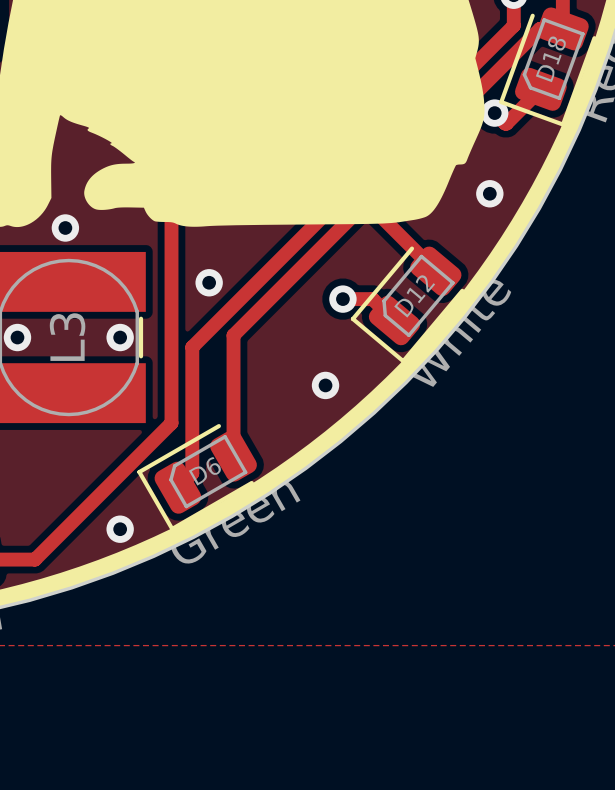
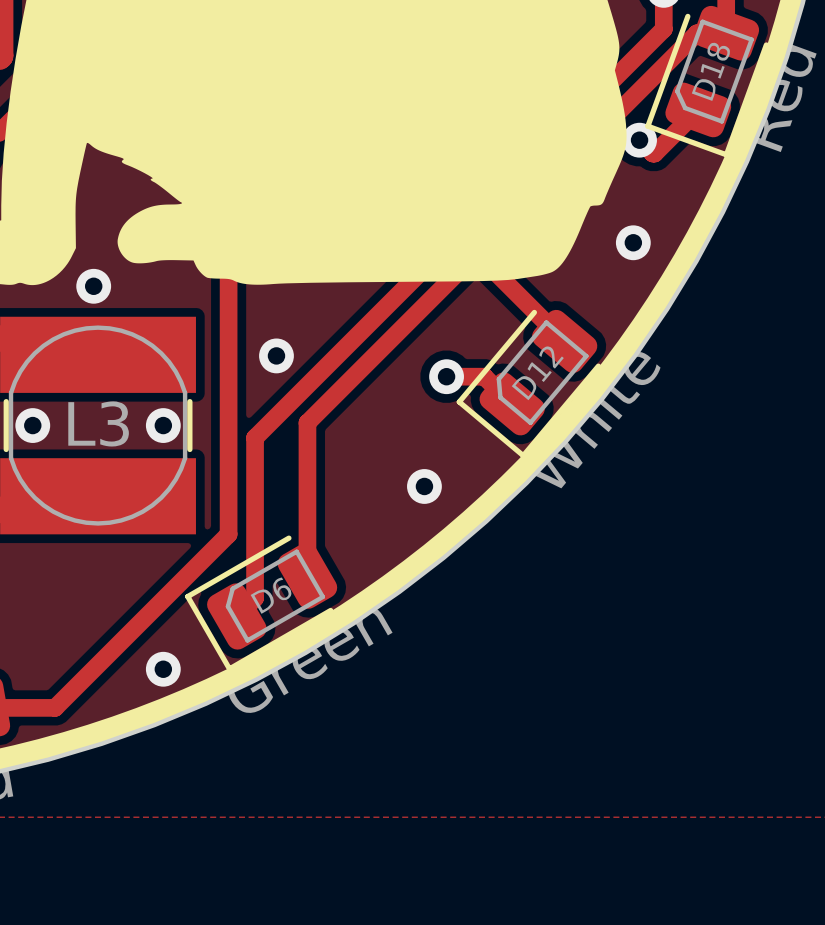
L3 name rotation: 0° (67, 337) -> 90° clockwise (98, 423)

